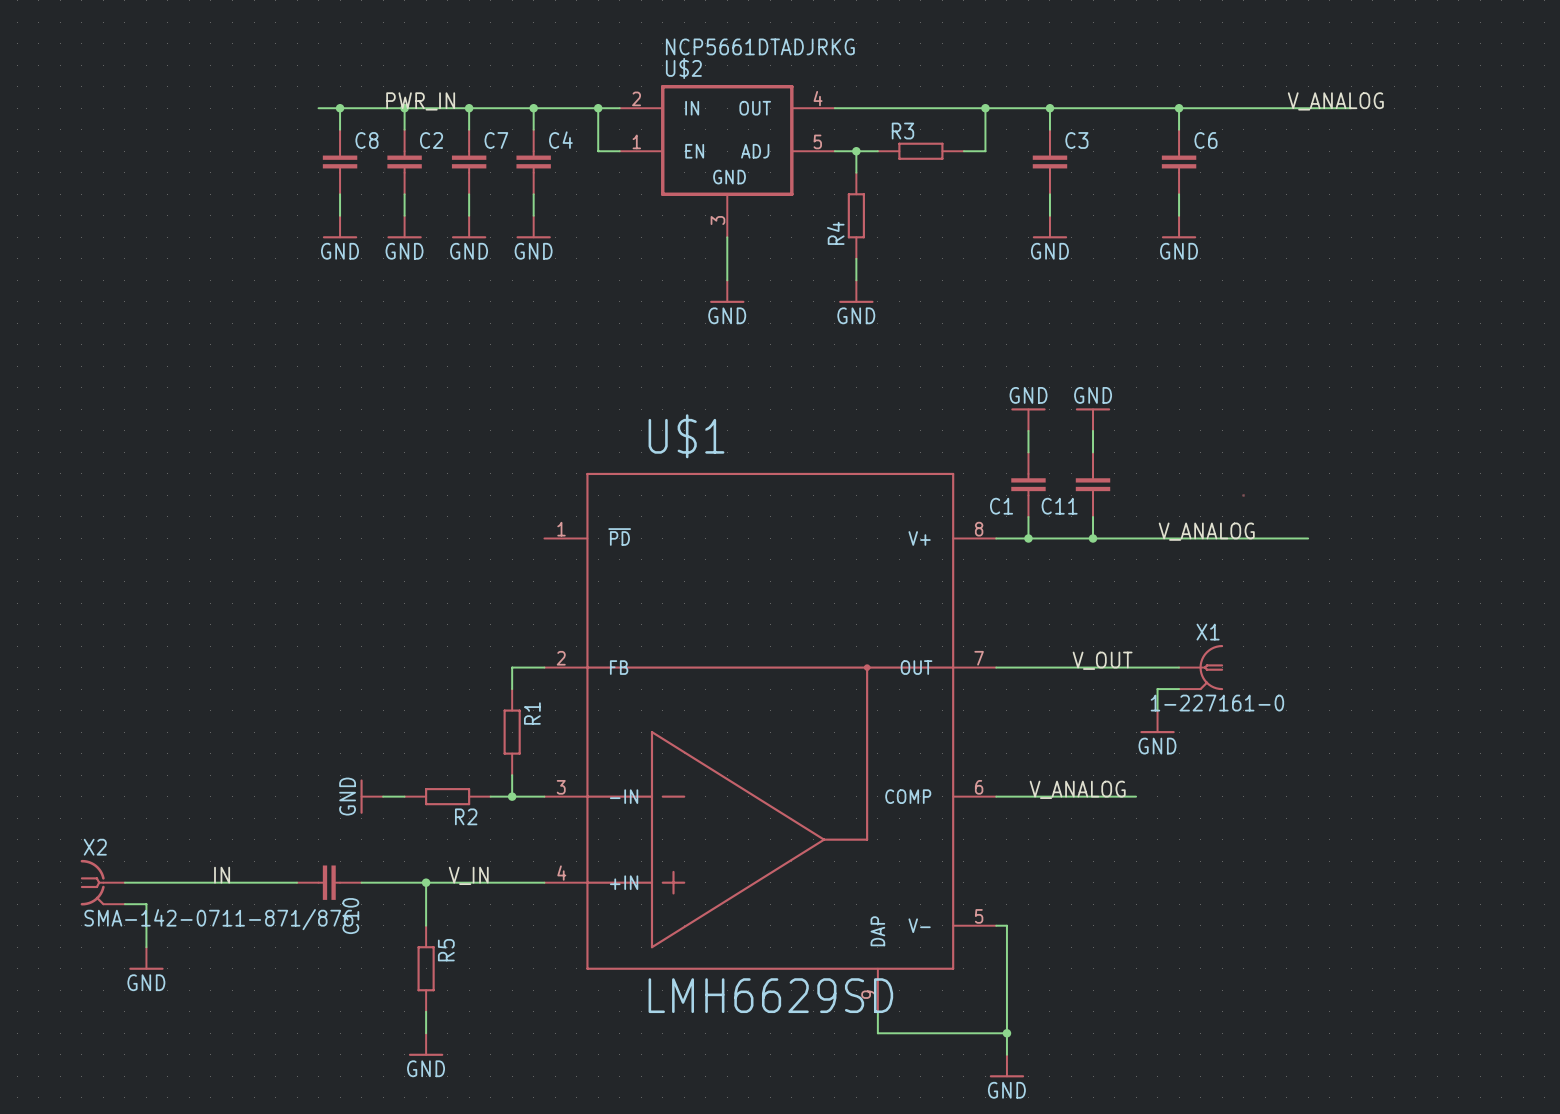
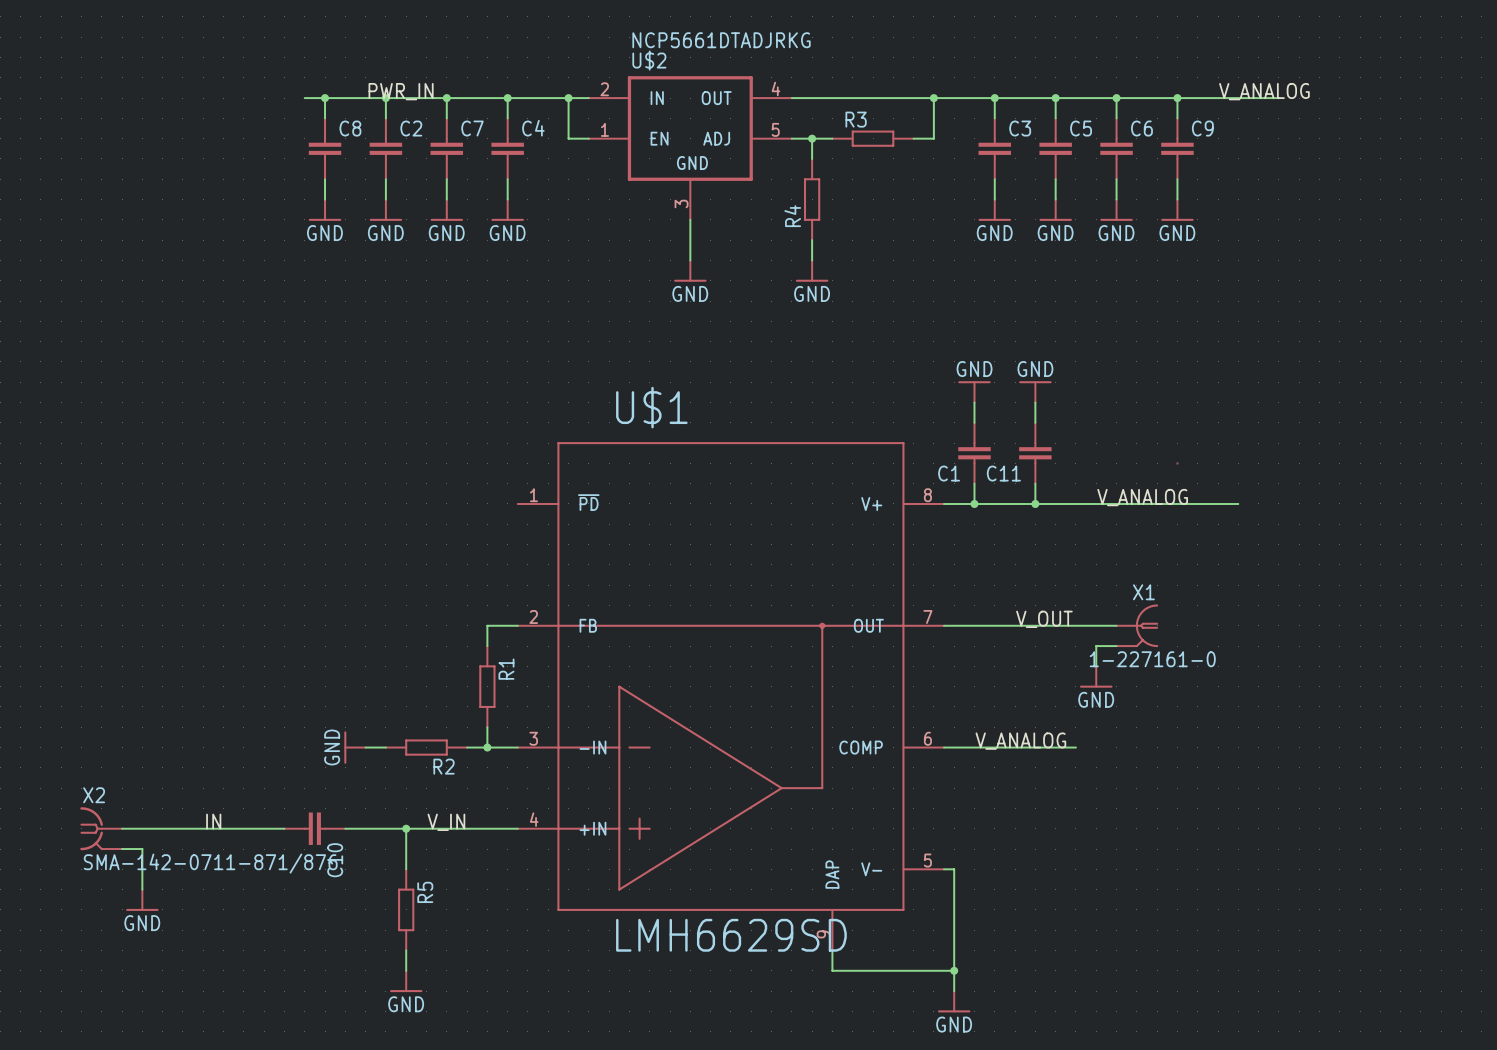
wire: none -> (1055, 98) (1055, 118)
junction: none -> (1055, 98)
wire: none -> (1177, 98) (1177, 118)
junction: none -> (1177, 98)
C5: none -> (1055, 148)
C9: none -> (1177, 148)
wire: none -> (1055, 179) (1055, 199)
wire: none -> (1177, 179) (1177, 199)
power symbol: none -> GND (1055, 210)
power symbol: none -> GND (1177, 210)

